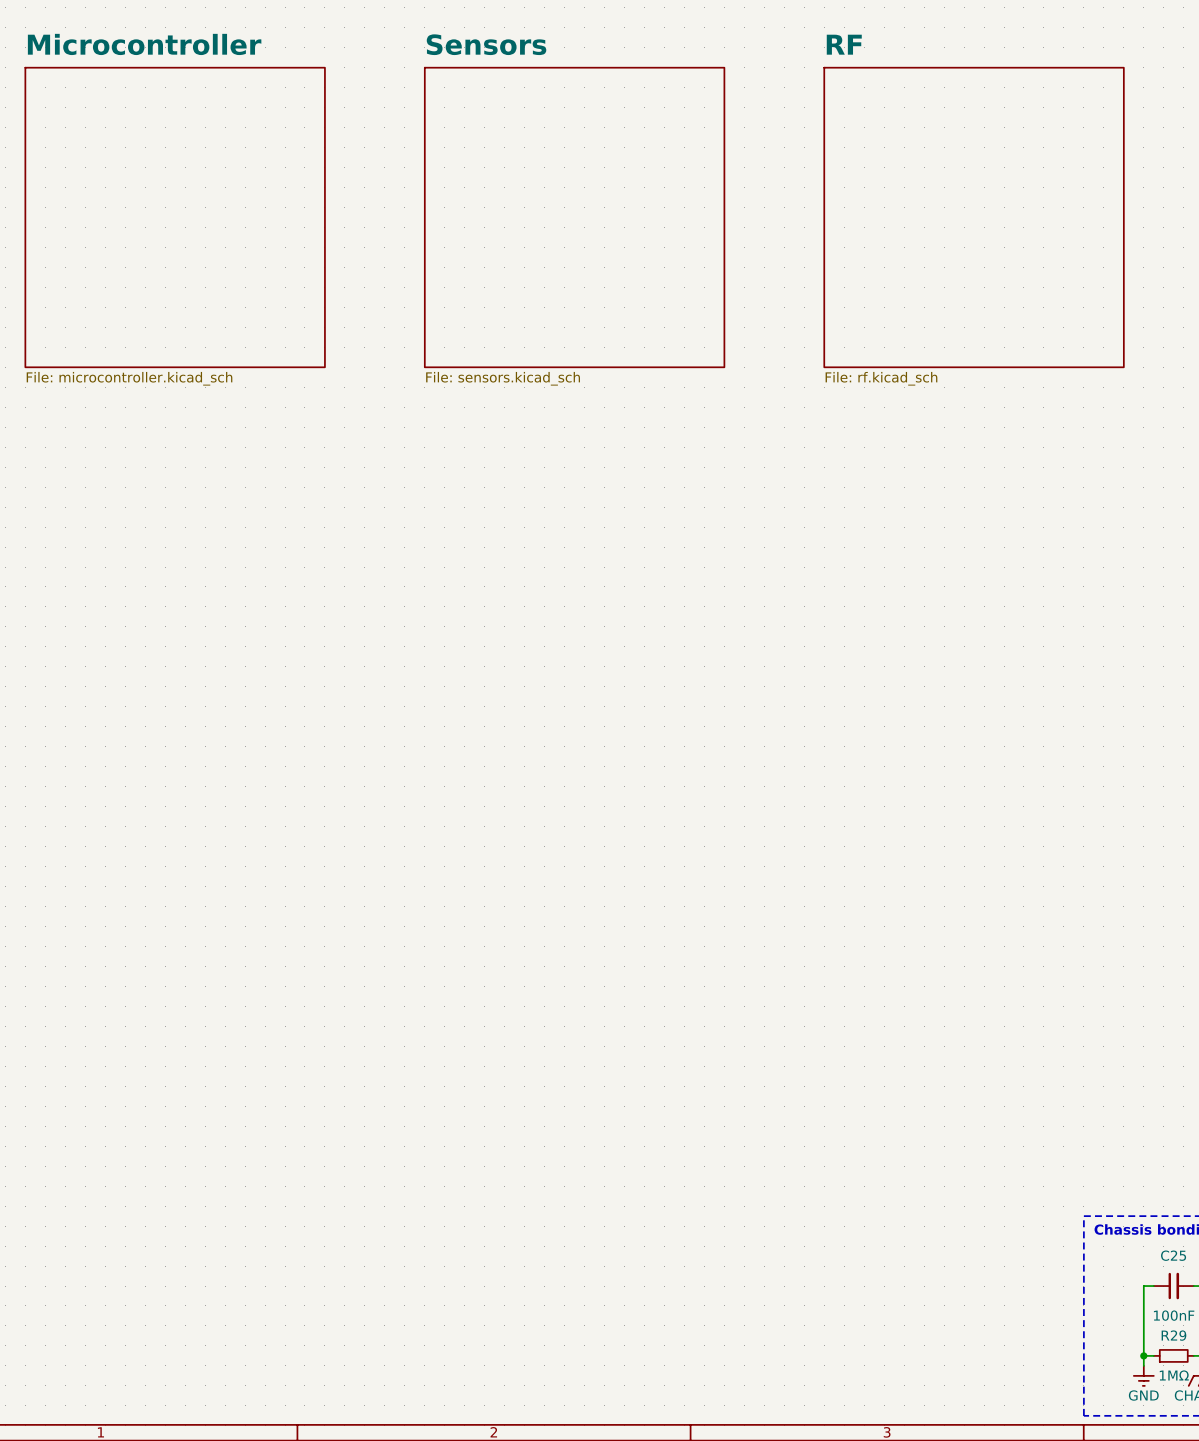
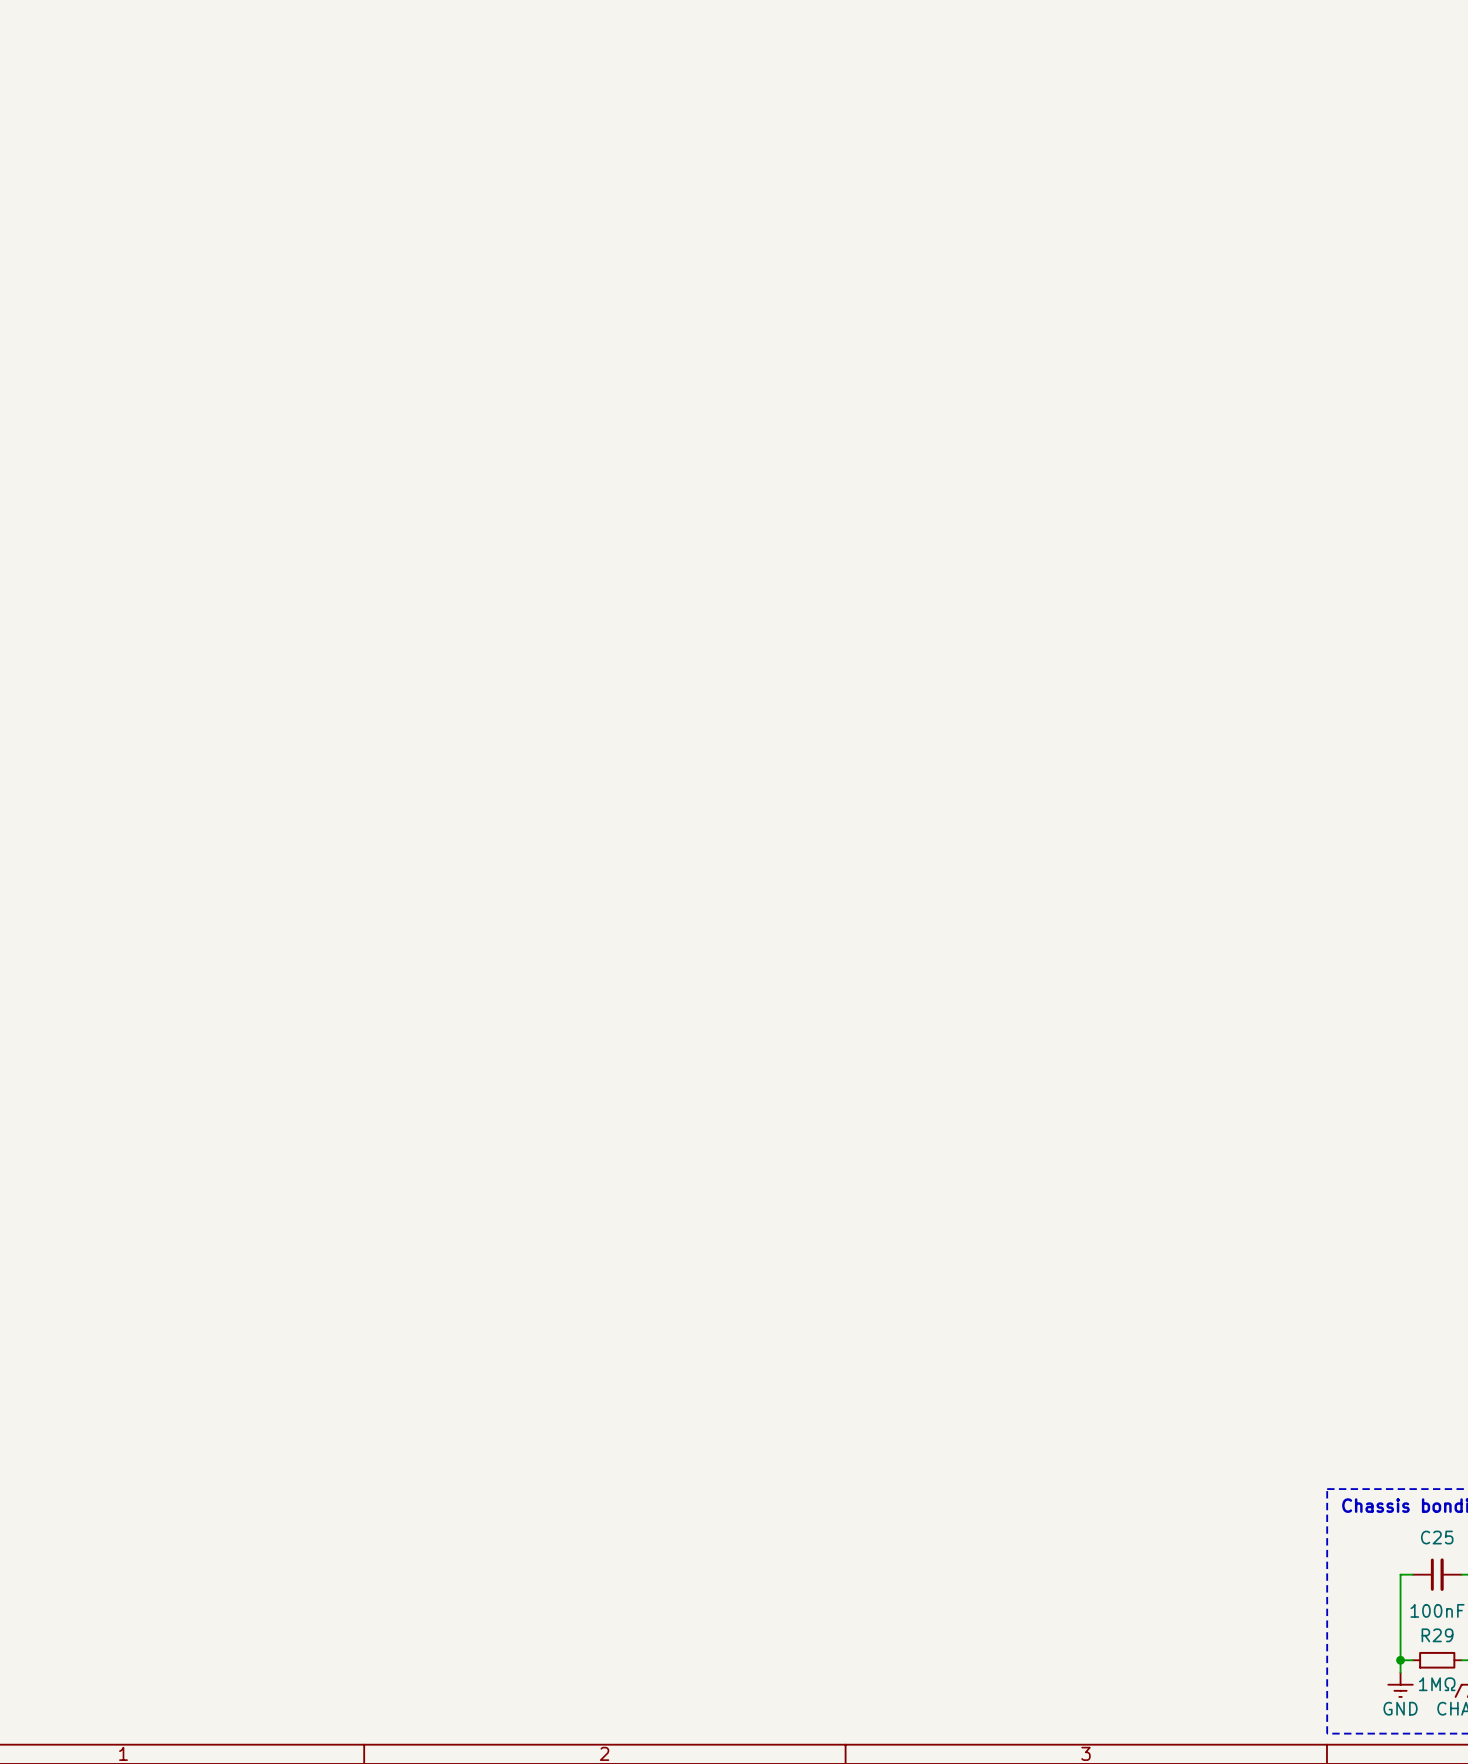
sheet Microcontroller: File: microcontroller.kicad_sch (175, 217) -> none
sheet Sensors: File: sensors.kicad_sch (574, 217) -> none
sheet RF: File: rf.kicad_sch (974, 217) -> none

